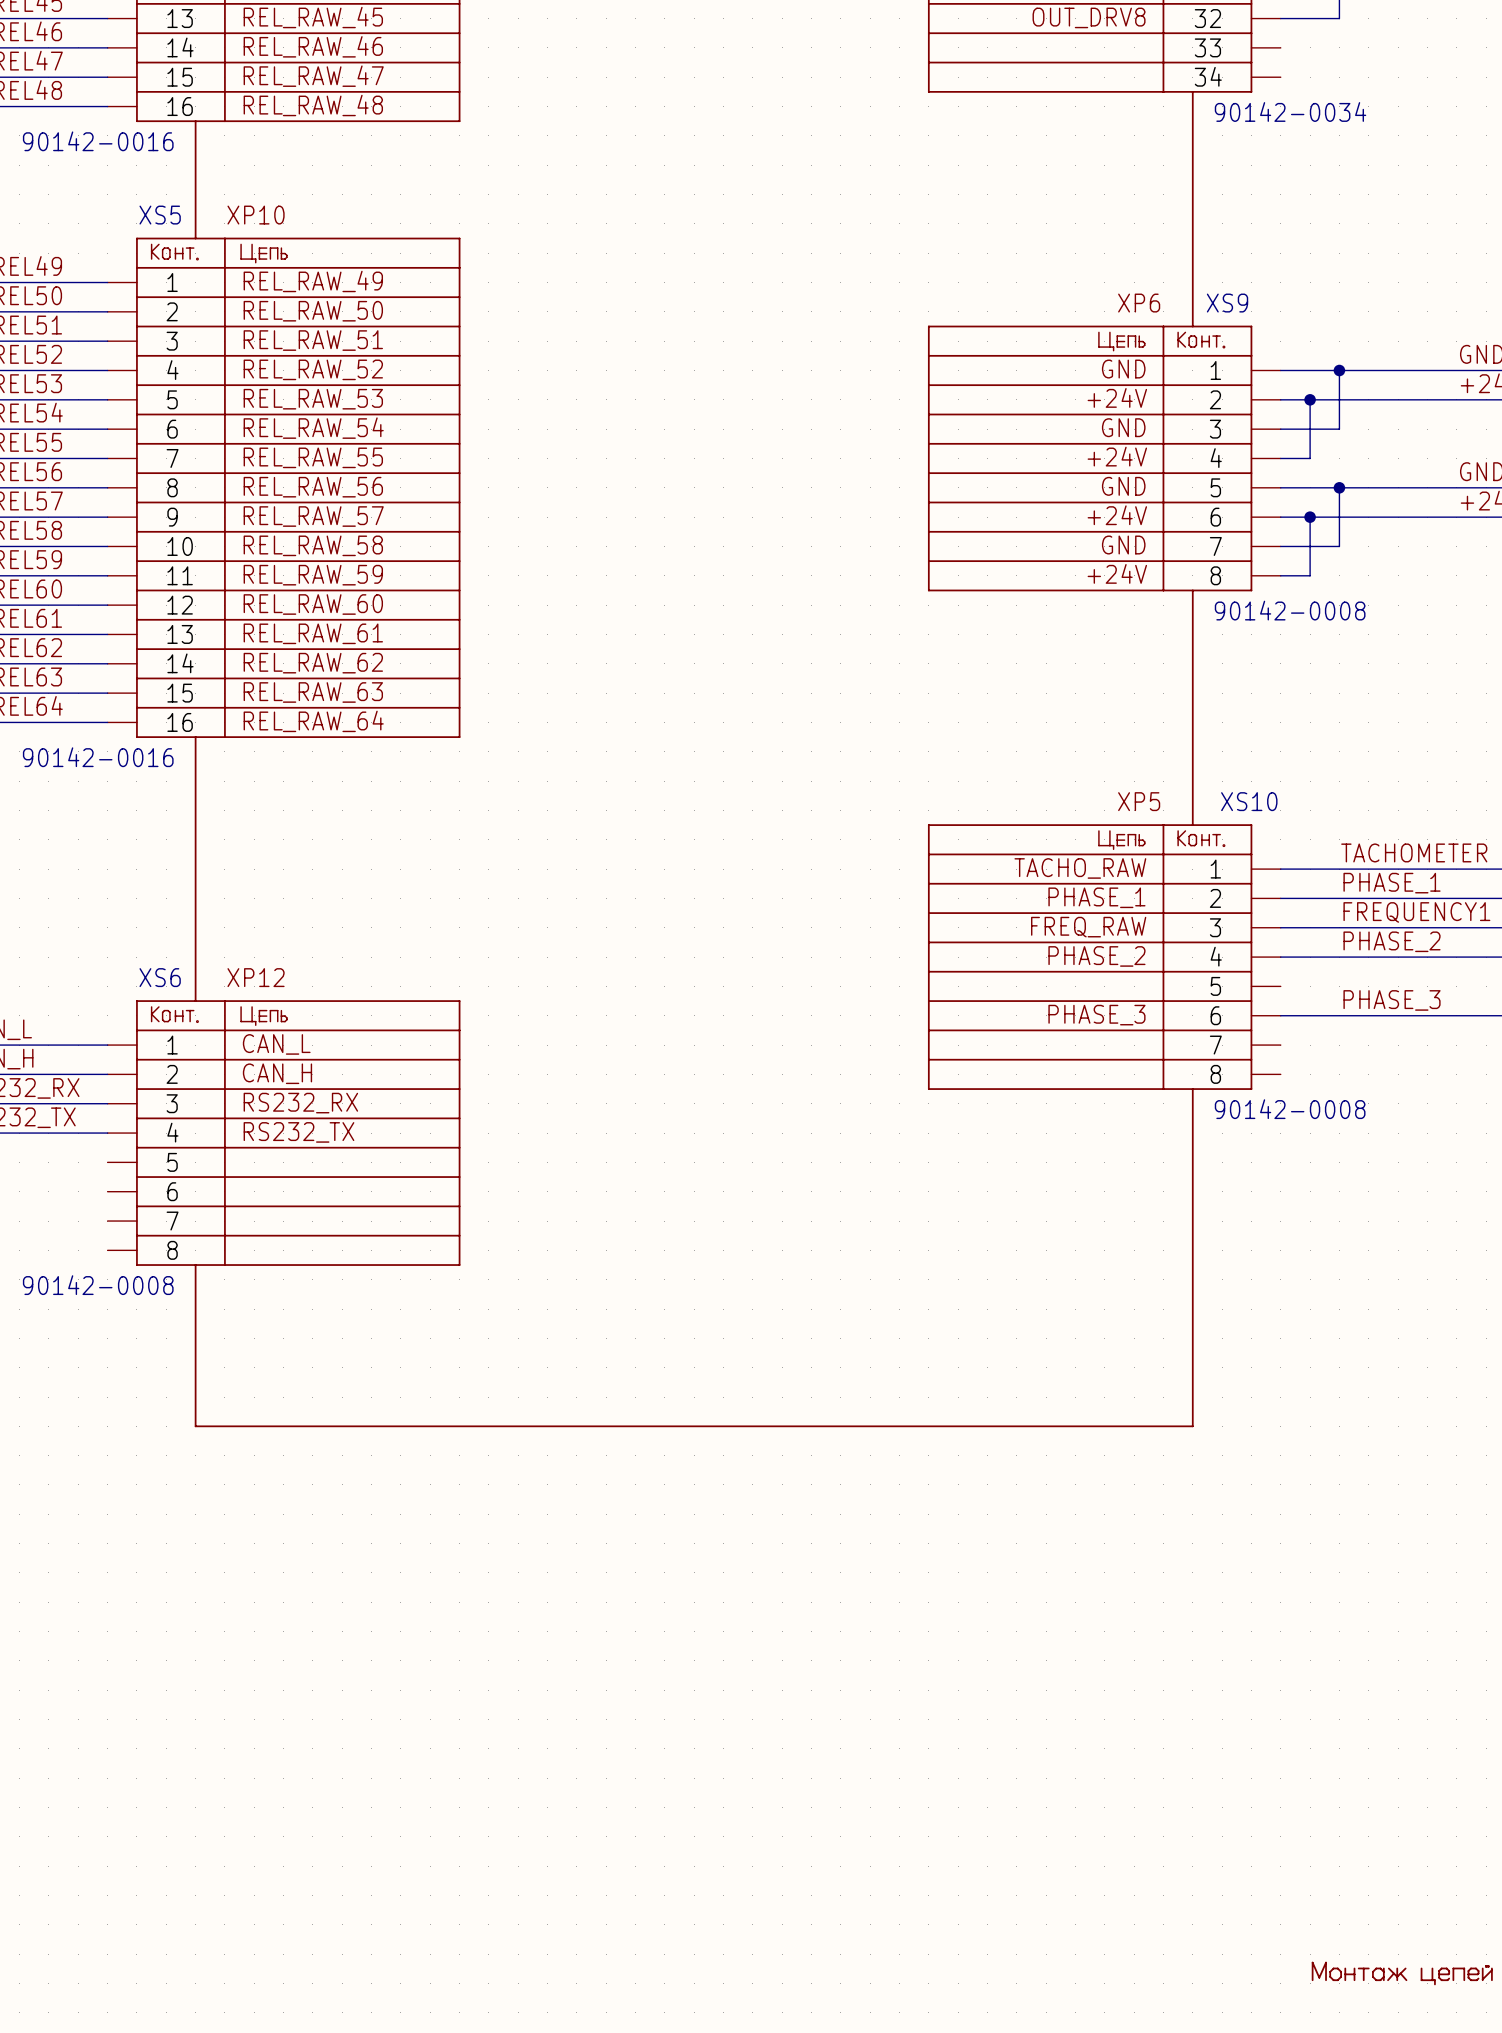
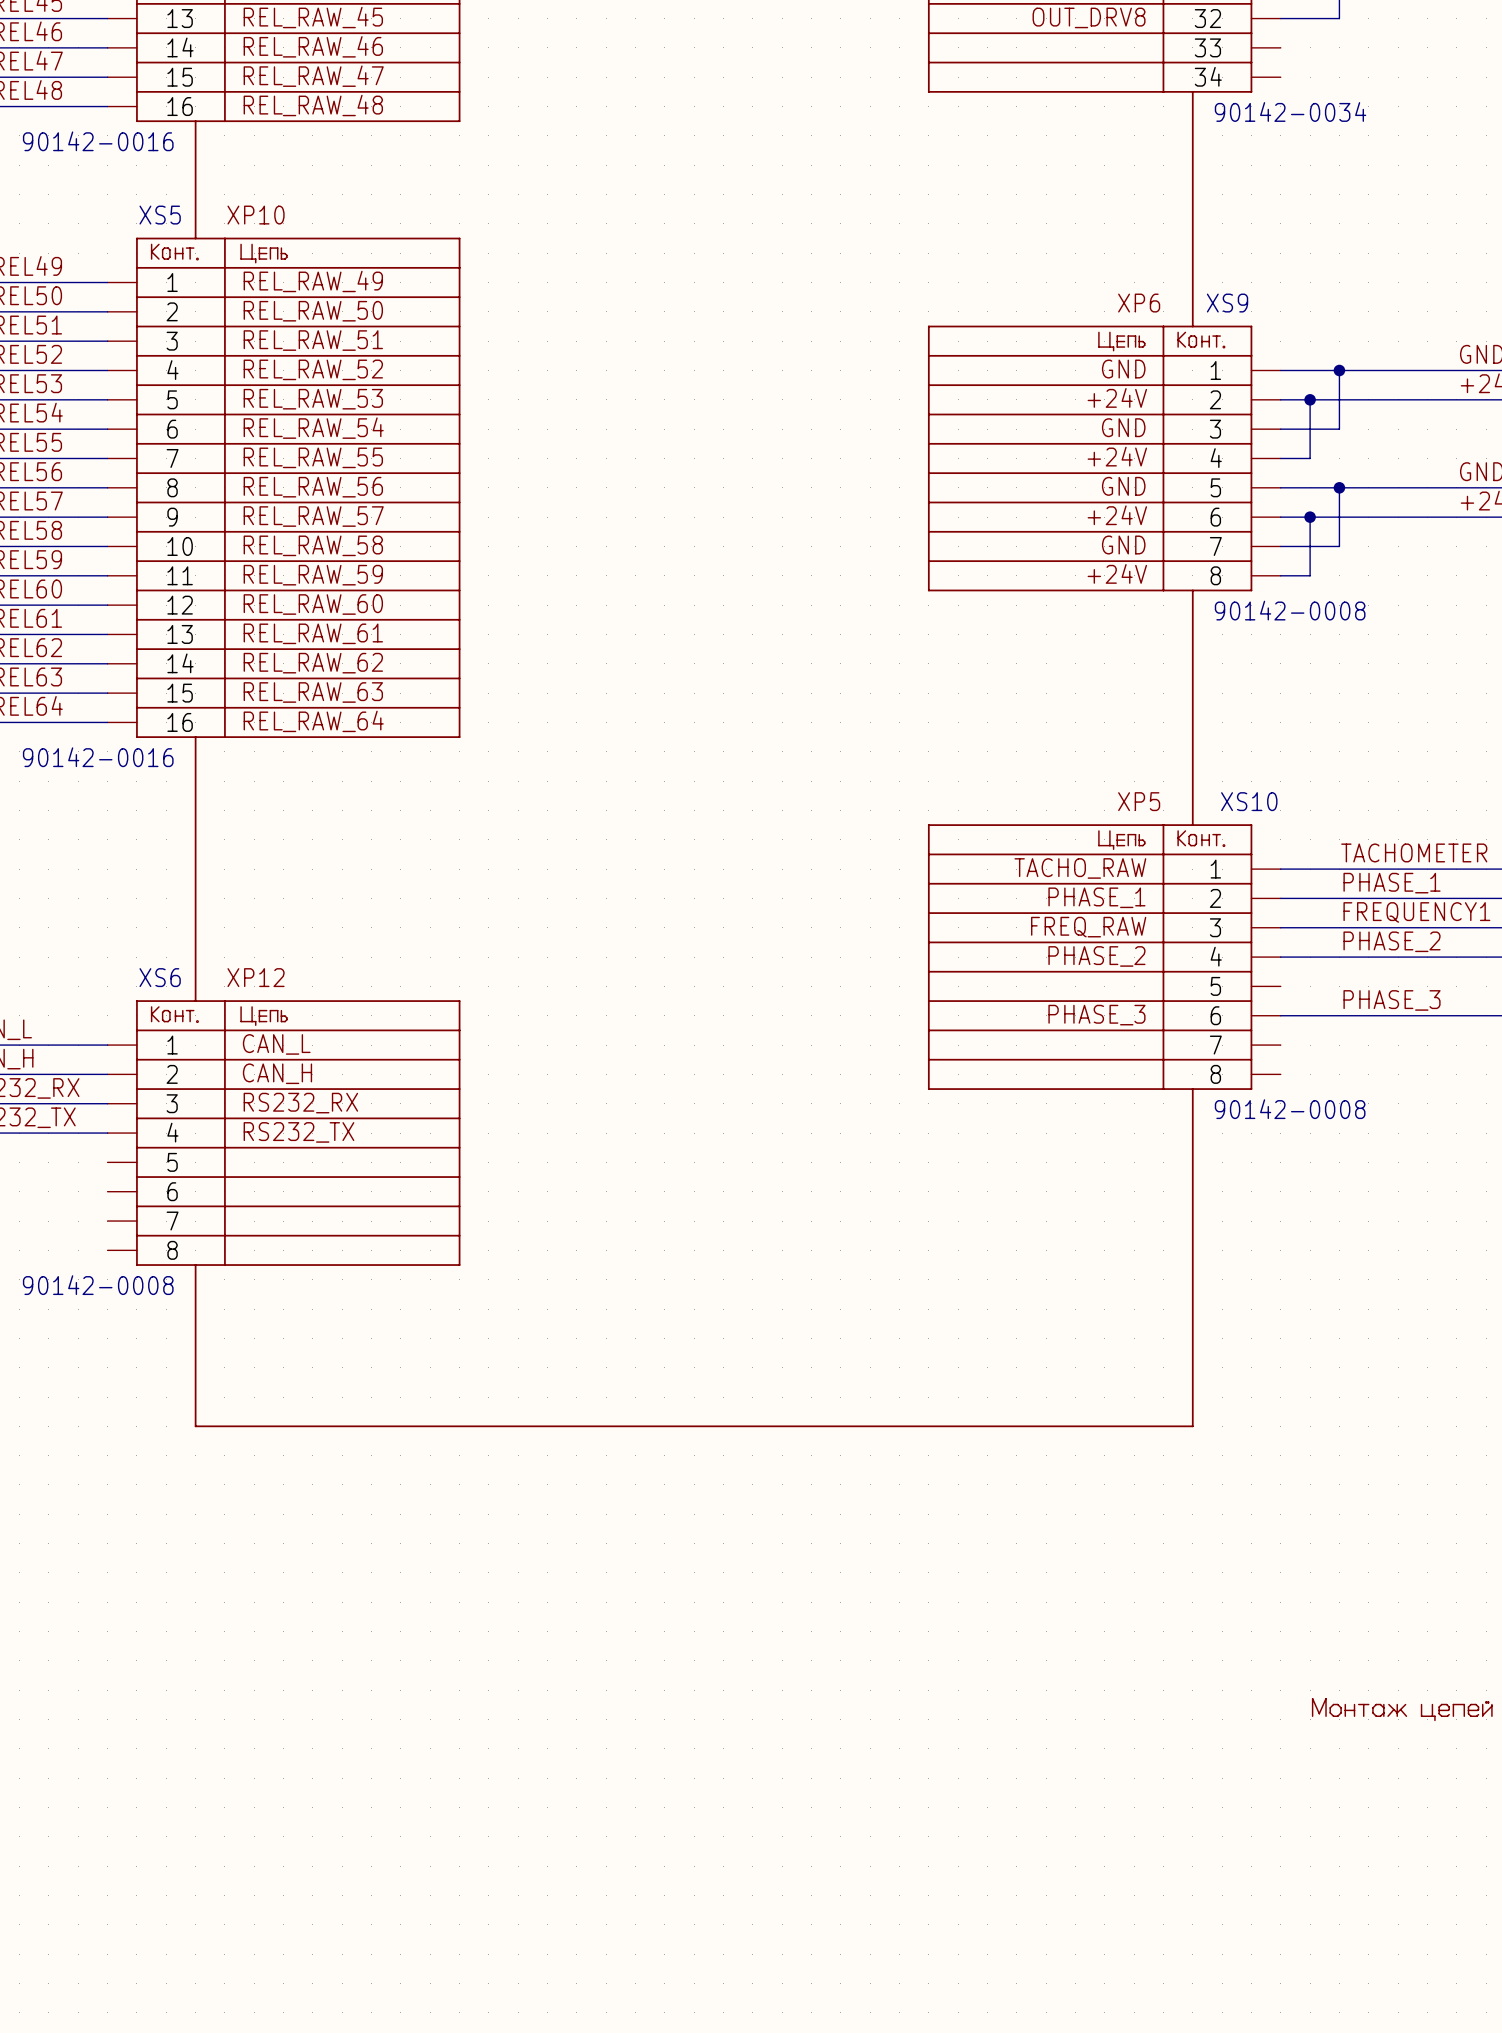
line: (1486, 1965) (1486, 1966) (1488, 1966) (1488, 1965) (1486, 1965) -> (1486, 1702) (1486, 1702) (1488, 1702) (1488, 1702) (1486, 1702)
line: (1333, 1968) (1337, 1968) (1341, 1971) (1341, 1976) (1337, 1980) (1333, 1980) (1330, 1976) (1330, 1971) (1333, 1968) -> (1333, 1704) (1337, 1704) (1341, 1707) (1341, 1712) (1337, 1716) (1333, 1716) (1330, 1712) (1330, 1707) (1333, 1704)
line: (1345, 1968) (1345, 1980) -> (1345, 1704) (1345, 1716)
line: (1354, 1968) (1354, 1980) -> (1354, 1704) (1354, 1716)
line: (1358, 1968) (1368, 1968) -> (1358, 1704) (1368, 1704)
line: (1363, 1968) (1363, 1980) -> (1363, 1704) (1363, 1716)
line: (1383, 1968) (1383, 1980) -> (1383, 1704) (1383, 1716)
line: (1388, 1968) (1397, 1976) (1405, 1968) -> (1388, 1704) (1397, 1712) (1405, 1704)
line: (1397, 1968) (1397, 1980) -> (1397, 1704) (1397, 1716)
line: (1421, 1968) (1421, 1980) (1434, 1980) (1434, 1984) -> (1421, 1704) (1421, 1716) (1434, 1716) (1434, 1720)
line: (1432, 1968) (1432, 1980) -> (1432, 1704) (1432, 1716)
line: (1482, 1968) (1482, 1980) -> (1482, 1704) (1482, 1716)
line: (1491, 1968) (1491, 1980) -> (1491, 1704) (1491, 1716)
line: (1491, 1970) (1482, 1979) -> (1491, 1706) (1482, 1715)
line: (1383, 1971) (1380, 1968) (1376, 1968) (1372, 1971) (1372, 1976) (1376, 1980) (1380, 1980) (1383, 1976) -> (1383, 1707) (1380, 1704) (1376, 1704) (1372, 1707) (1372, 1712) (1376, 1716) (1380, 1716) (1383, 1712)
line: (1393, 1973) (1388, 1980) -> (1393, 1709) (1388, 1716)
line: (1400, 1973) (1406, 1980) -> (1400, 1709) (1406, 1716)
line: (1345, 1974) (1354, 1974) -> (1345, 1710) (1354, 1710)
line: (1439, 1974) (1448, 1974) (1449, 1971) (1446, 1968) (1441, 1968) (1439, 1971) (1439, 1977) (1441, 1980) (1449, 1978) -> (1439, 1710) (1448, 1710) (1449, 1707) (1446, 1704) (1441, 1704) (1439, 1707) (1439, 1713) (1441, 1716) (1449, 1714)
line: (1468, 1974) (1477, 1974) (1478, 1971) (1476, 1968) (1470, 1968) (1468, 1971) (1468, 1977) (1470, 1980) (1478, 1978) -> (1468, 1710) (1477, 1710) (1478, 1707) (1476, 1704) (1470, 1704) (1468, 1707) (1468, 1713) (1470, 1716) (1478, 1714)
line: (1312, 1980) (1312, 1962) (1319, 1977) (1326, 1962) (1326, 1980) -> (1312, 1716) (1312, 1698) (1319, 1713) (1326, 1698) (1326, 1716)
line: (1453, 1980) (1453, 1968) (1464, 1968) (1464, 1980) -> (1453, 1716) (1453, 1704) (1464, 1704) (1464, 1716)

